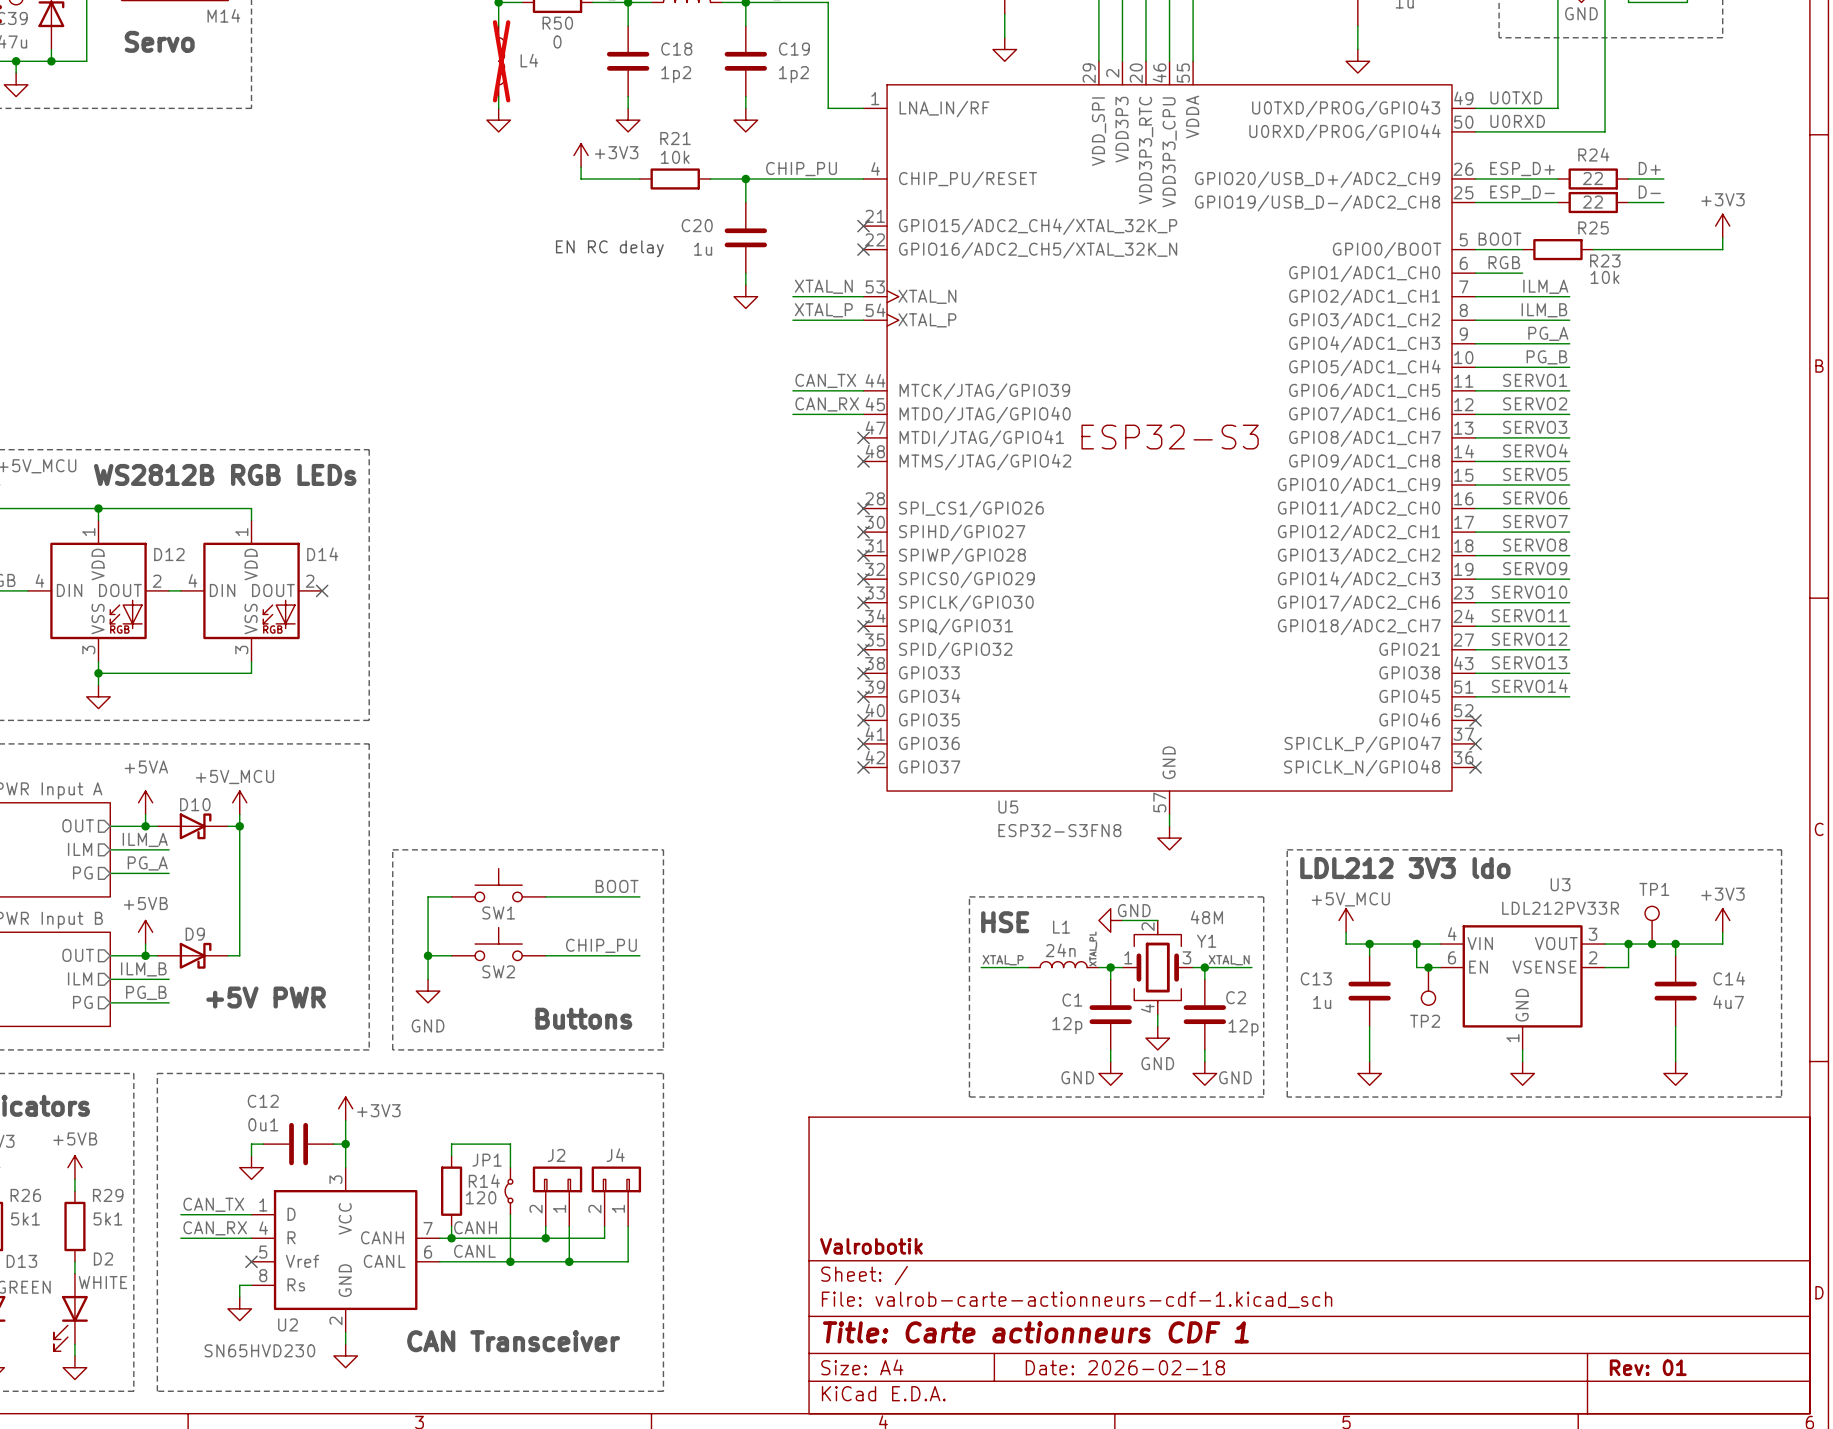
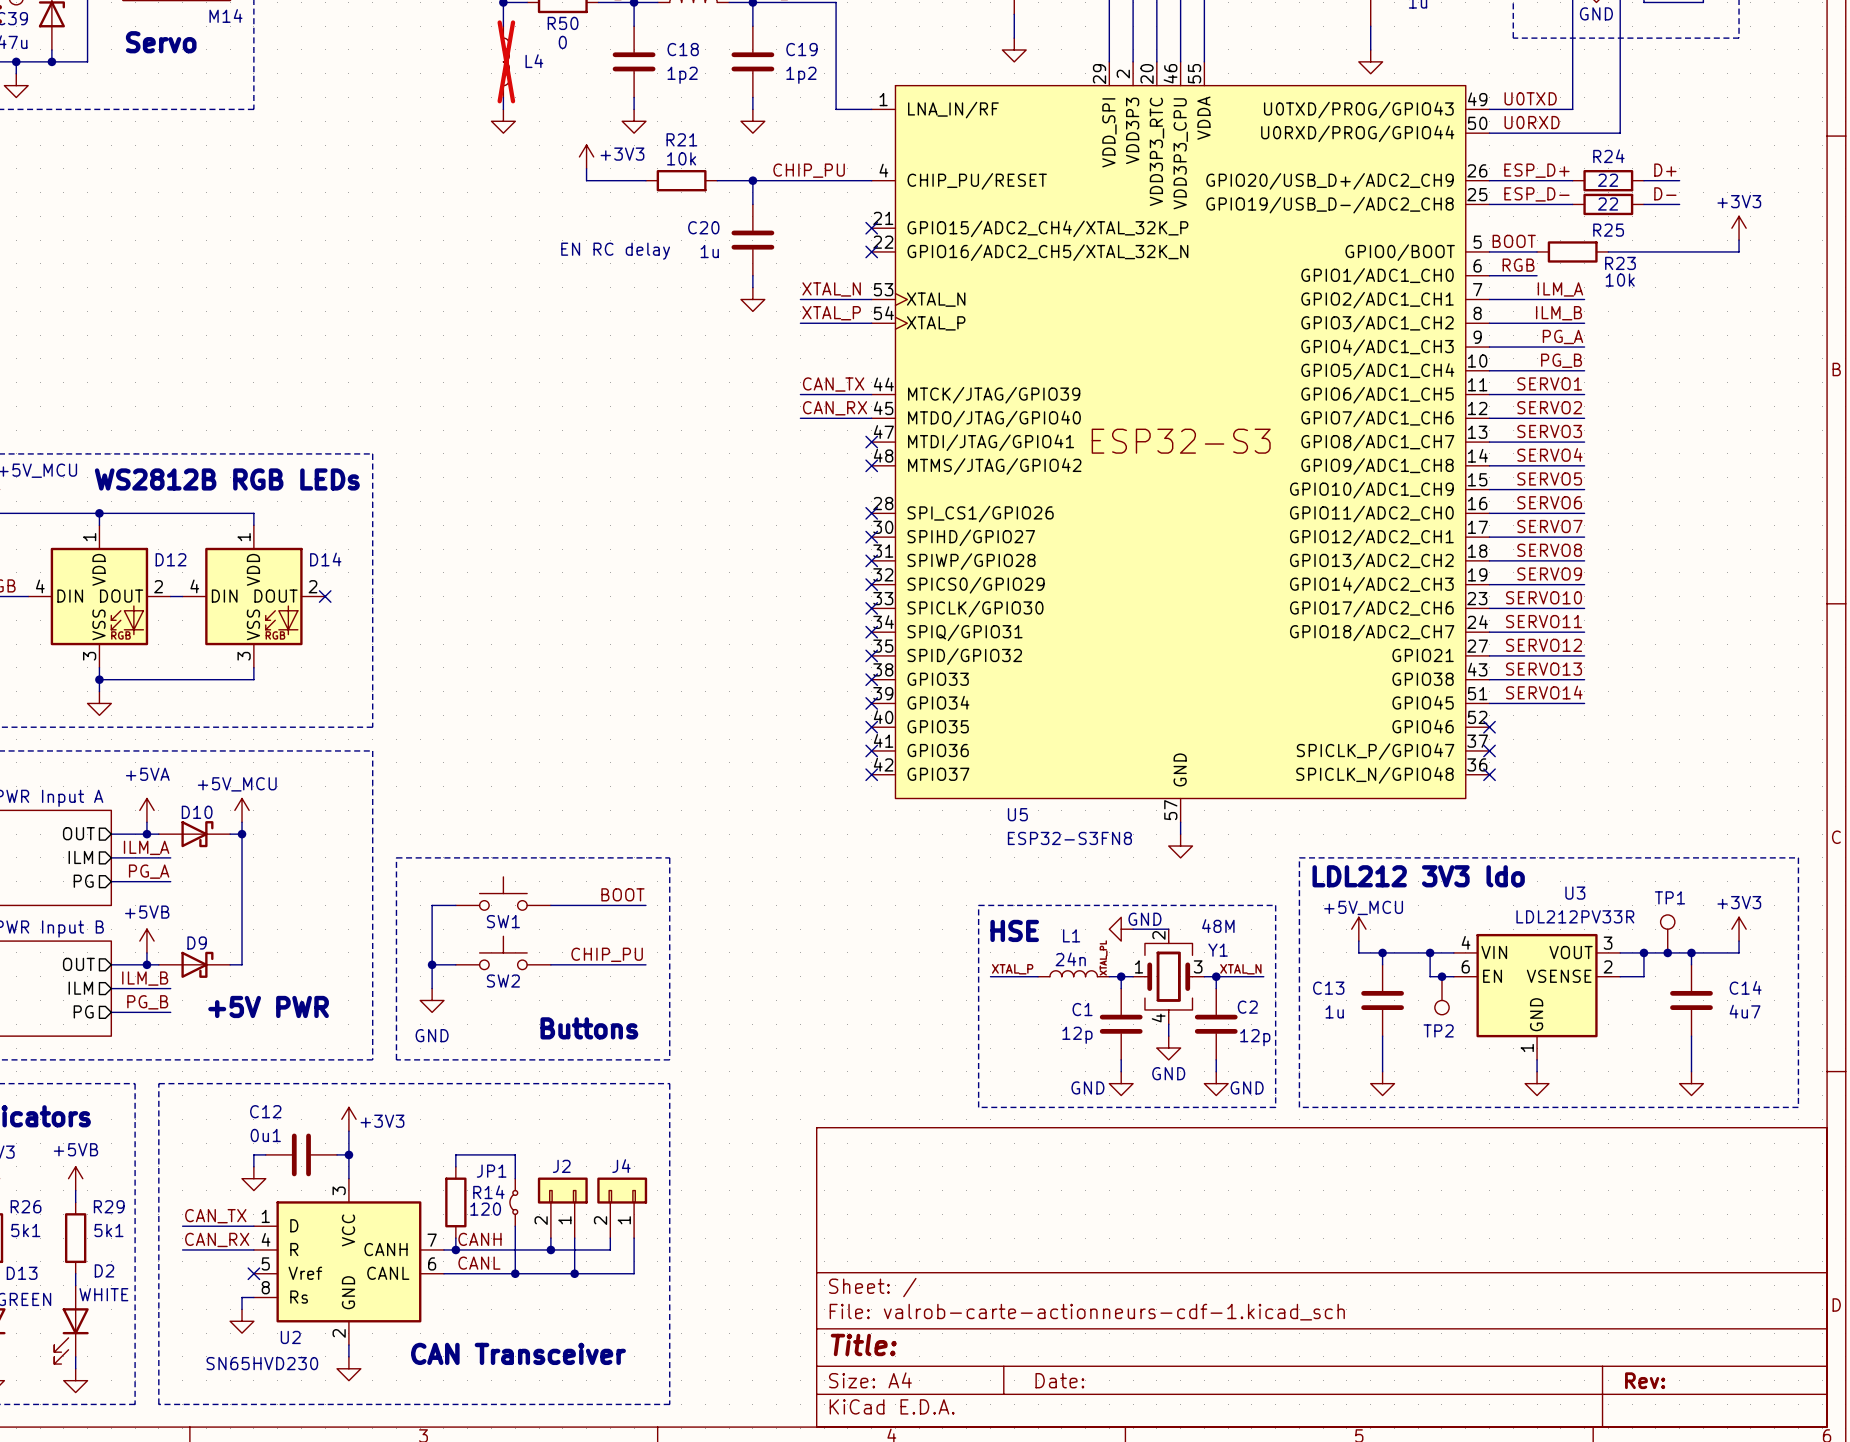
title block: Valrobotik (871, 1246) -> none
title block: Title: Carte actionneurs CDF 1 (1035, 1332) -> Title: (863, 1344)
title block: Date: 2026-02-18 (1125, 1367) -> Date: (1059, 1380)
title block: Rev: 01 (1648, 1367) -> Rev: (1645, 1380)

